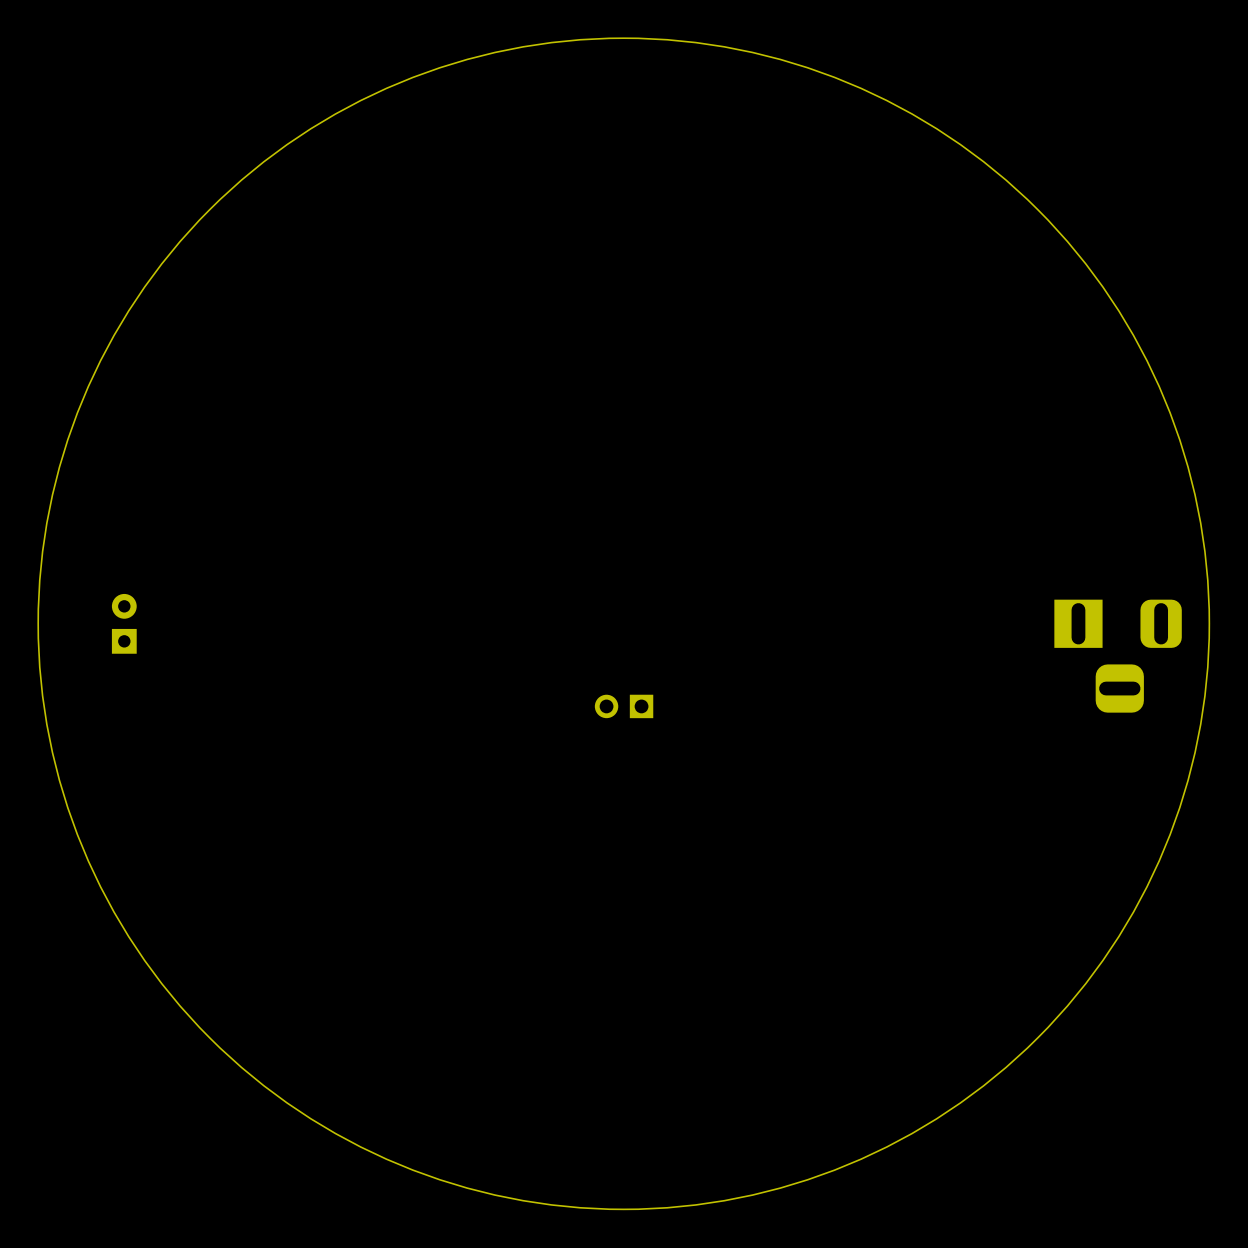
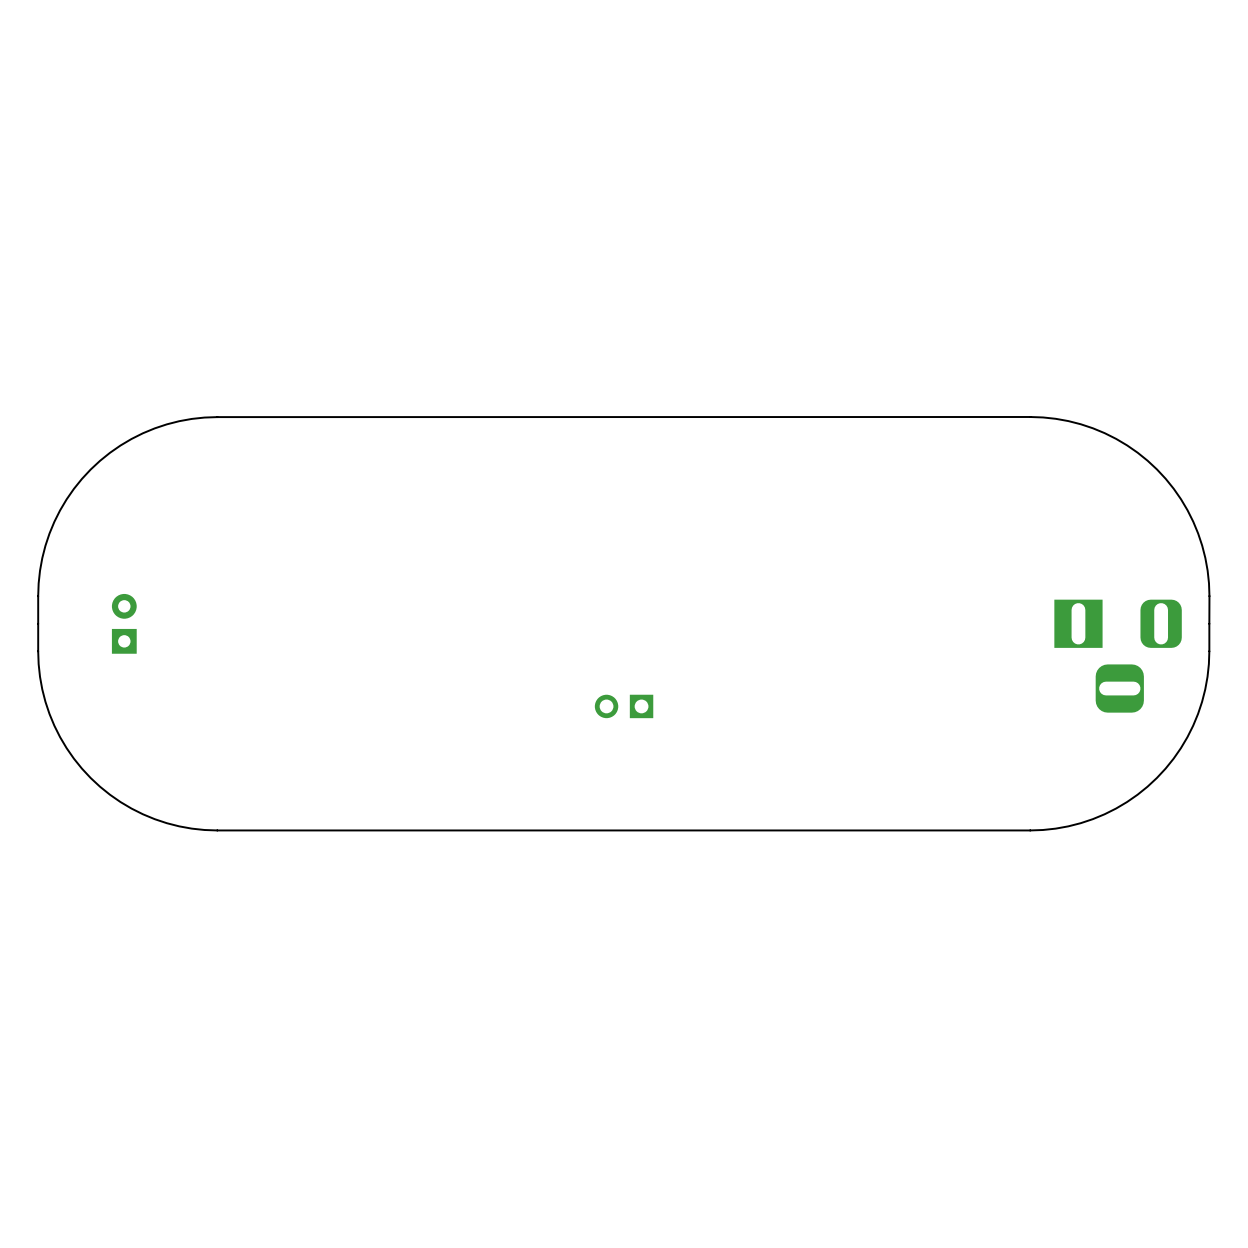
round board edge: [37, 37, 1211, 1211] -> none
board edge: none -> (1030, 416) (217, 417) (191, 418) (166, 424) (131, 439) (100, 460) (73, 488) (54, 521) (45, 545) (38, 583) (38, 664) (45, 701) (54, 725) (66, 748) (81, 768) (100, 786) (120, 802) (142, 814) (166, 823) (191, 828) (217, 830) (1030, 830) (1055, 828) (1080, 823) (1116, 808) (1147, 786) (1165, 768) (1187, 737) (1198, 713) (1207, 676) (1209, 596) (1207, 570) (1198, 533) (1187, 510) (1173, 488) (1147, 460) (1116, 438) (1092, 428) (1068, 421) (1030, 416)

